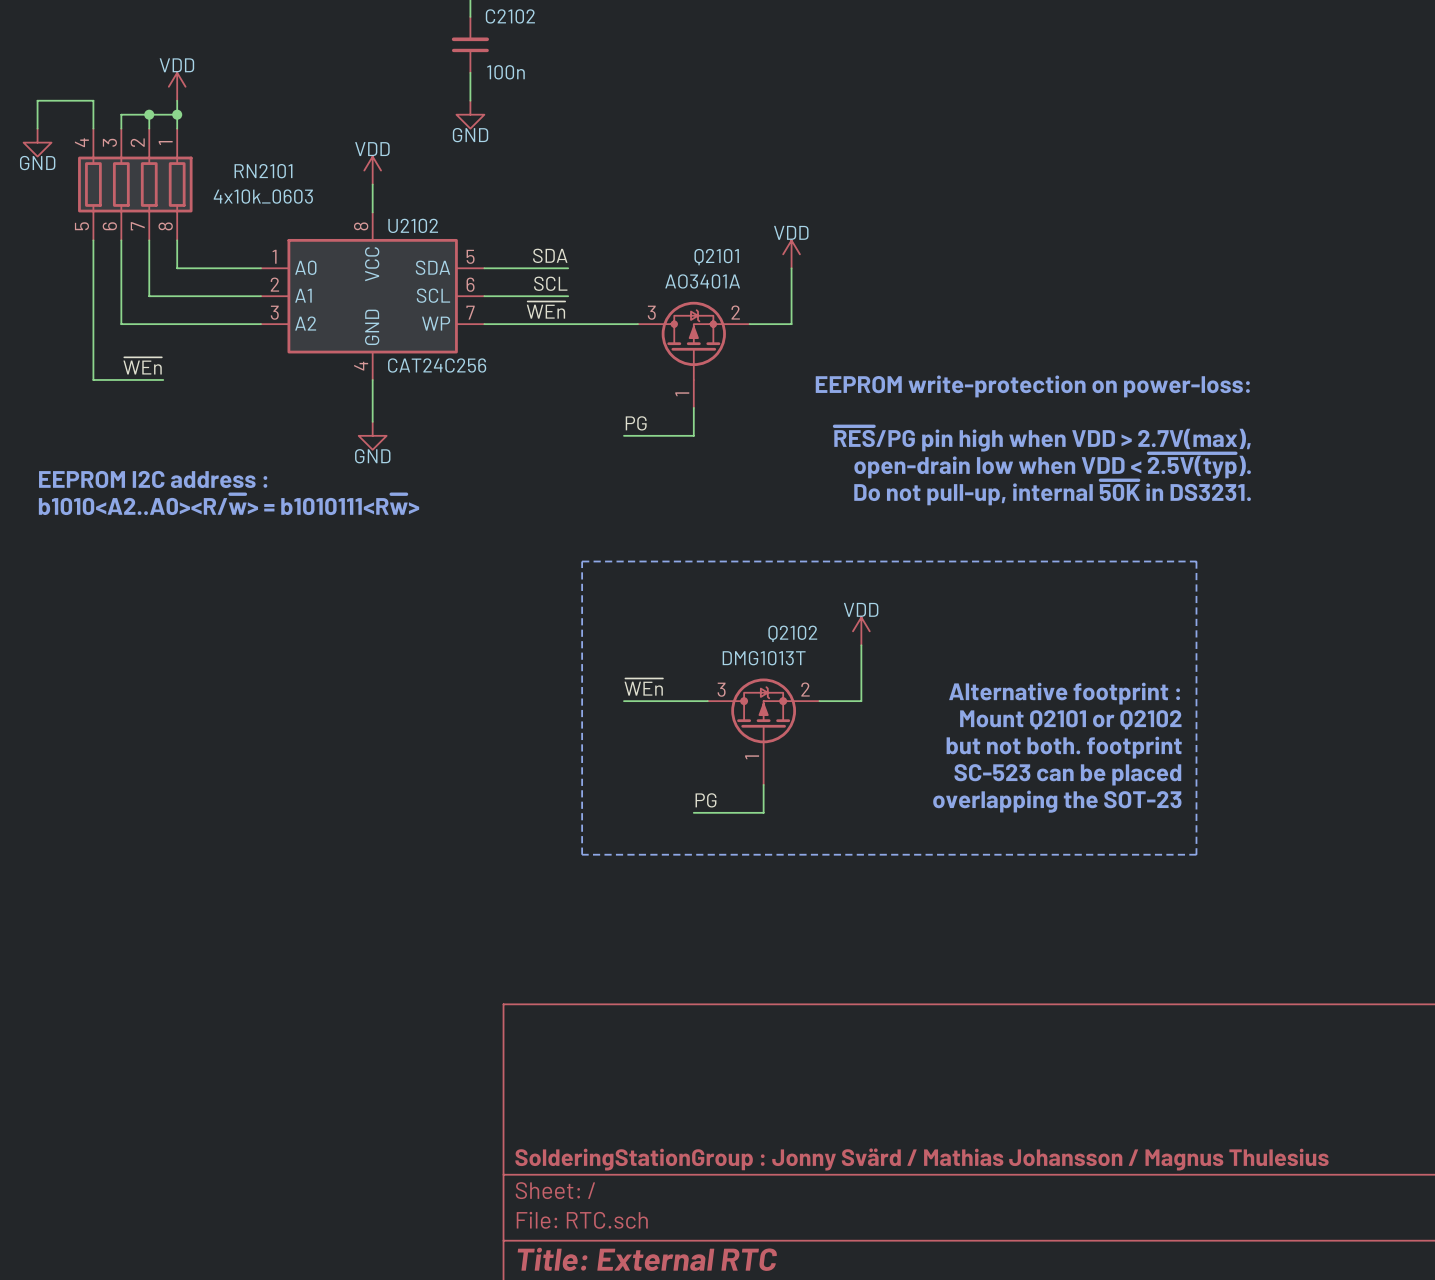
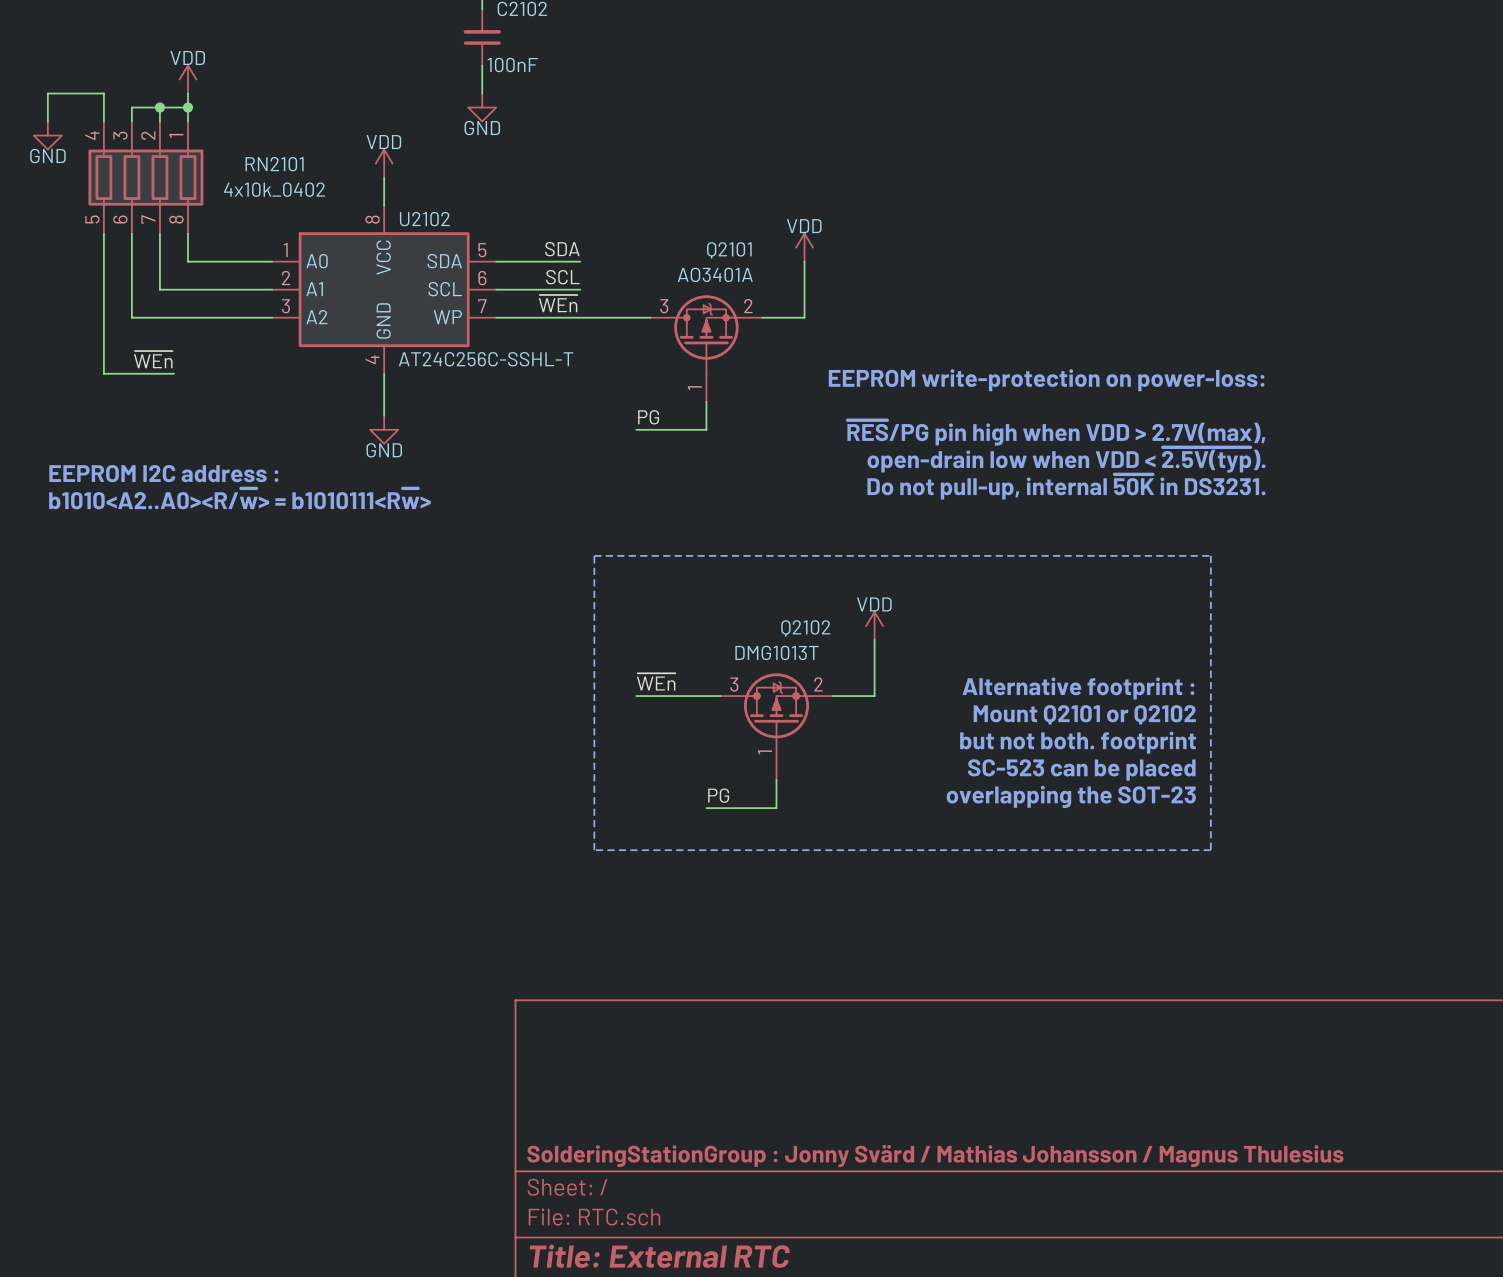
C2102 value: 100n (505, 72) -> 100nF (512, 64)
RN2101 value: 4x10k_0603 (263, 196) -> 4x10k_0402 (274, 189)
U2102 value: CAT24C256 (437, 365) -> AT24C256C-SSHL-T (486, 359)

